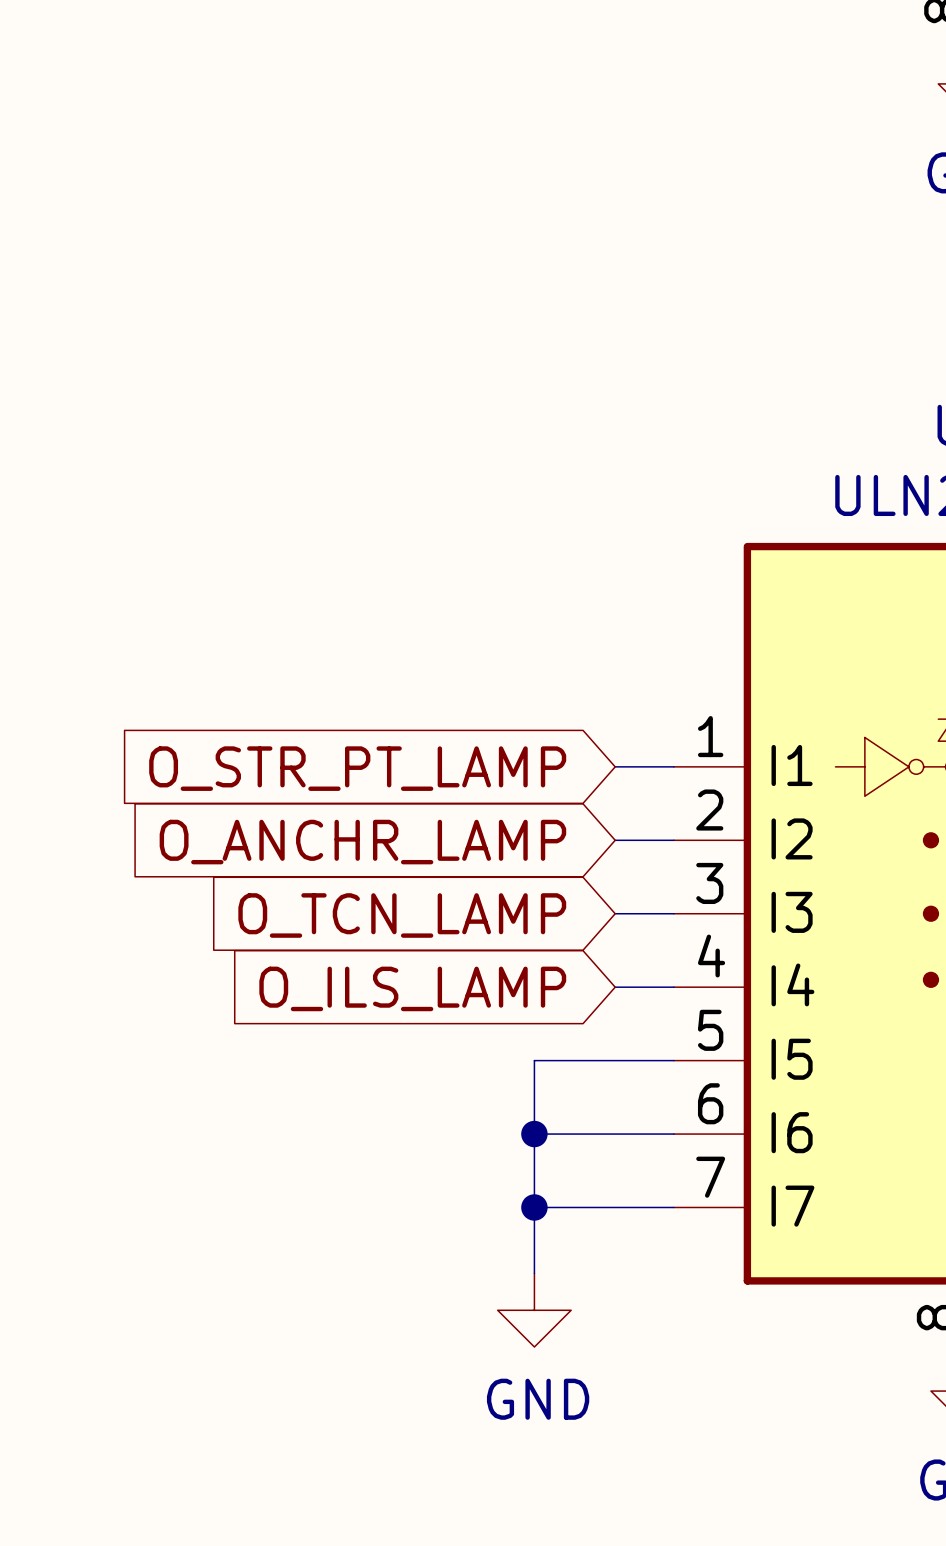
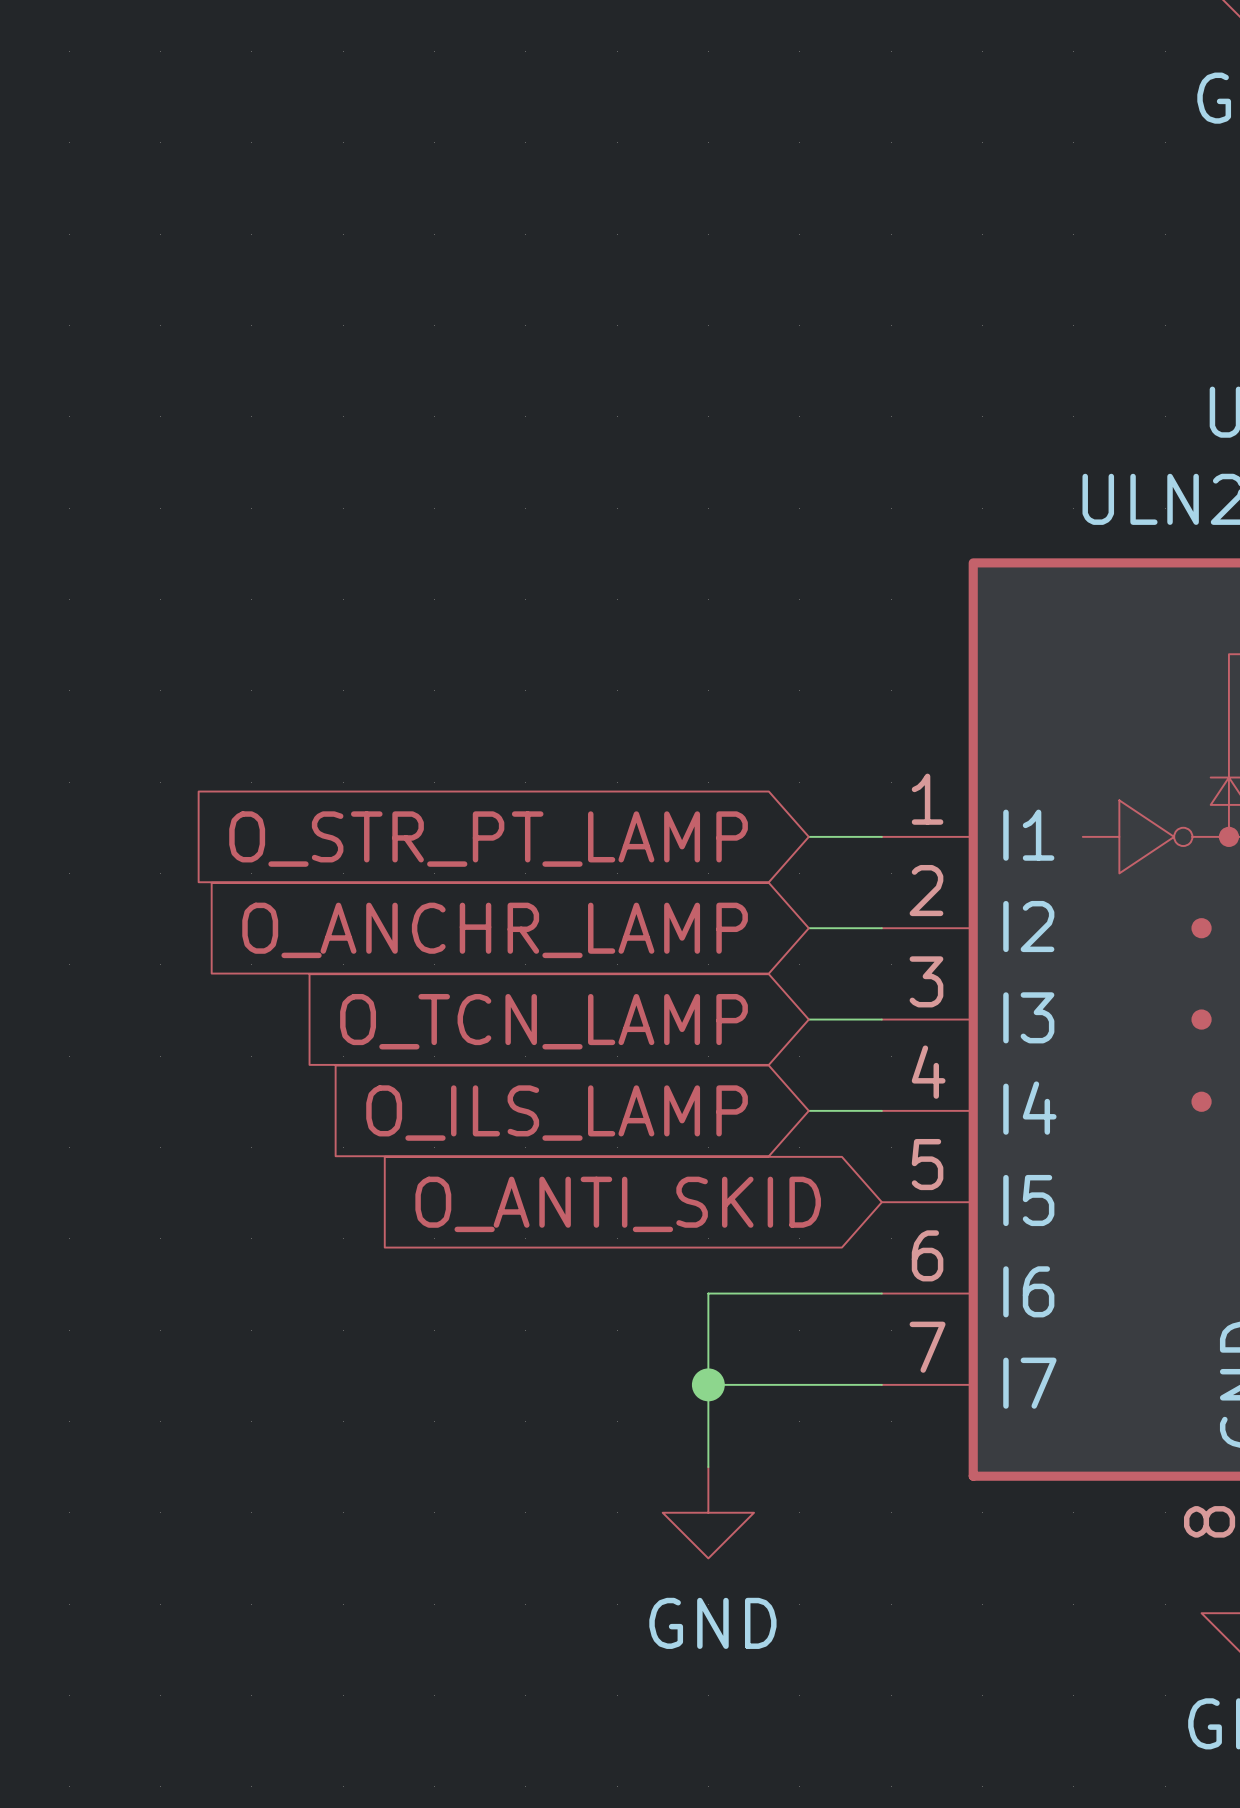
wire: (673, 1060) (534, 1060) (534, 1134) -> none
global label: none -> O_ANTI_SKID (618, 1204)
junction: (534, 1134) -> none

